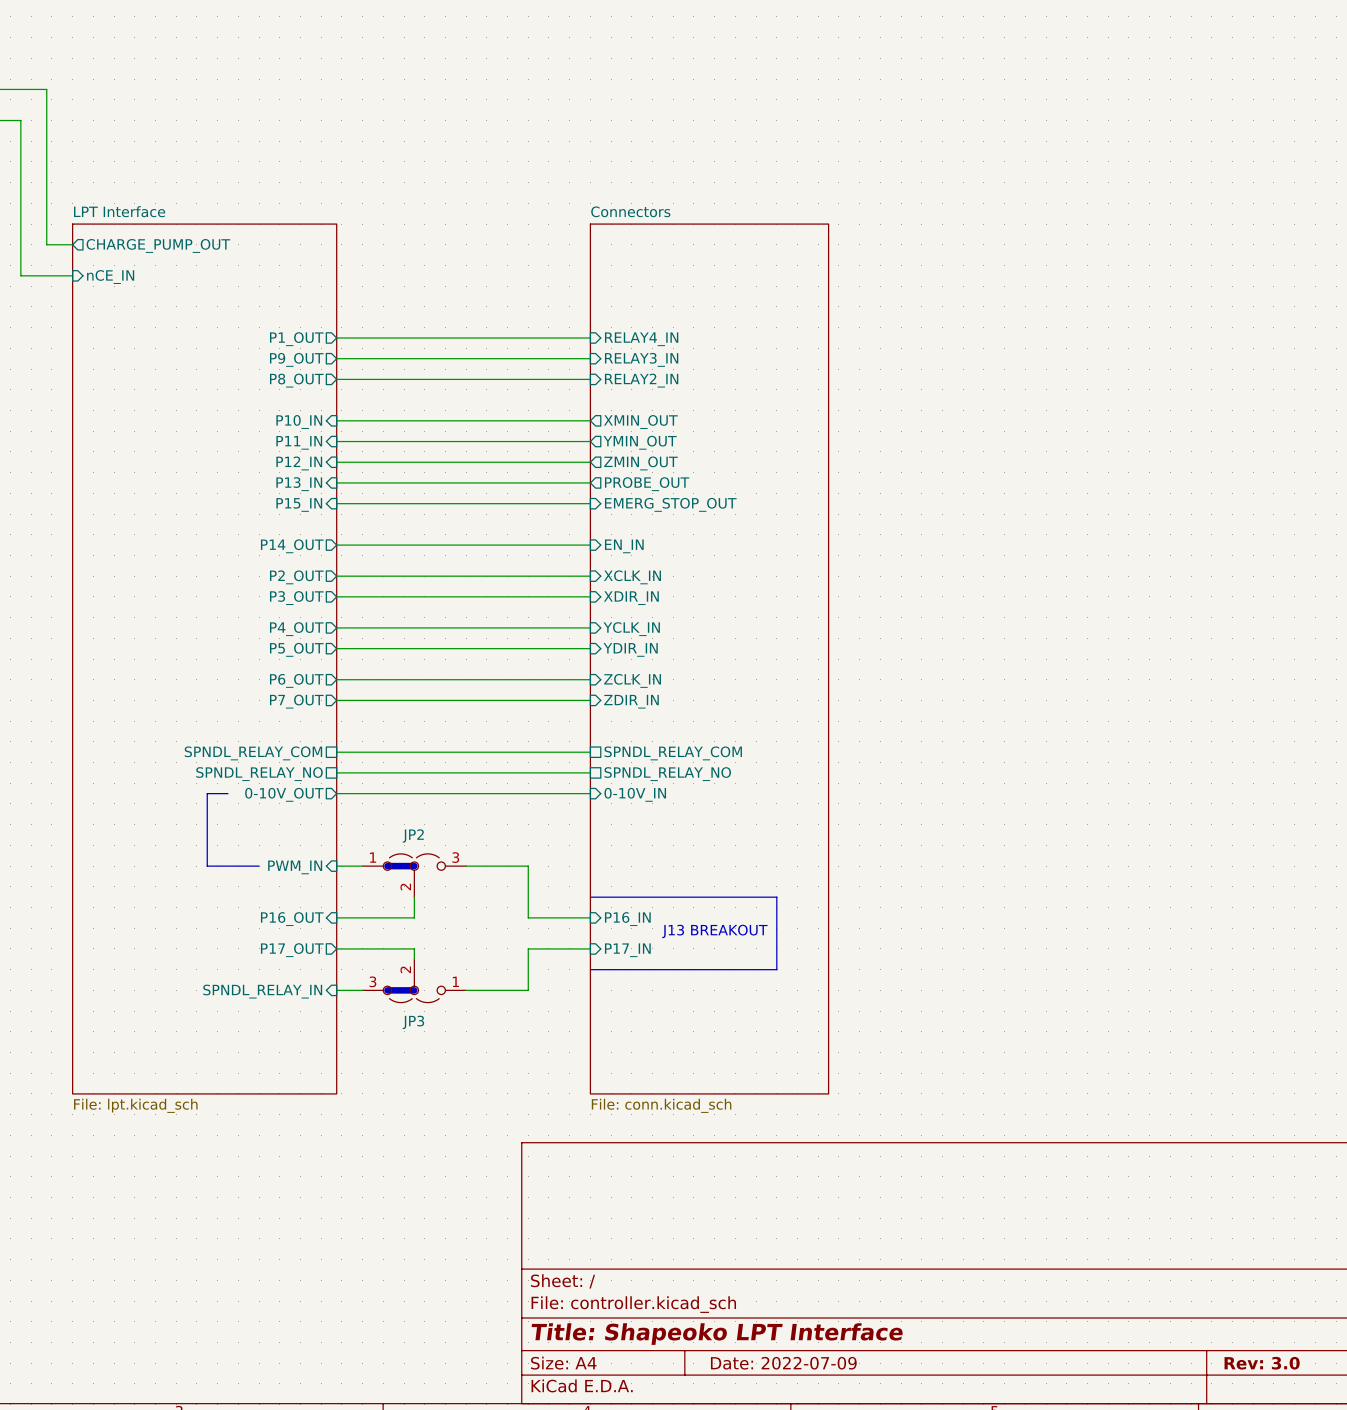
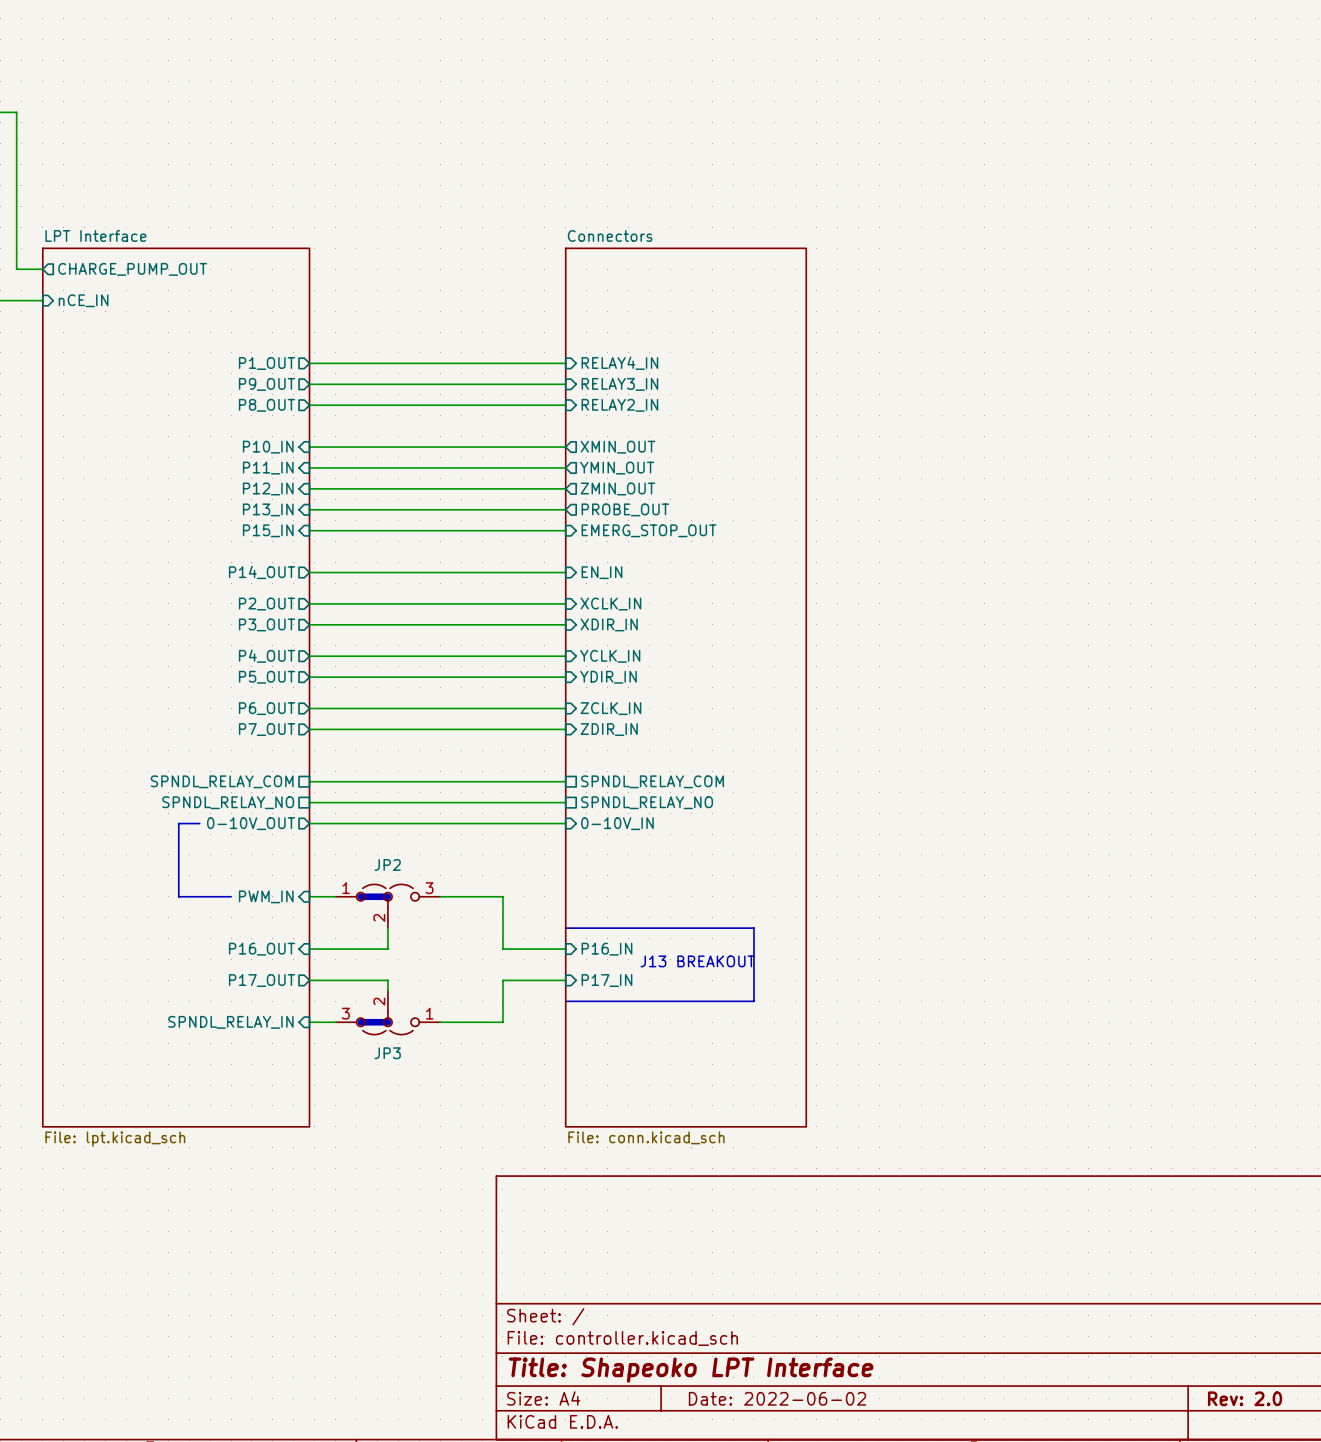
title block: Date: 2022-07-09 (783, 1363) -> Date: 2022-06-02 (777, 1398)
title block: Rev: 3.0 (1262, 1363) -> Rev: 2.0 (1245, 1398)

